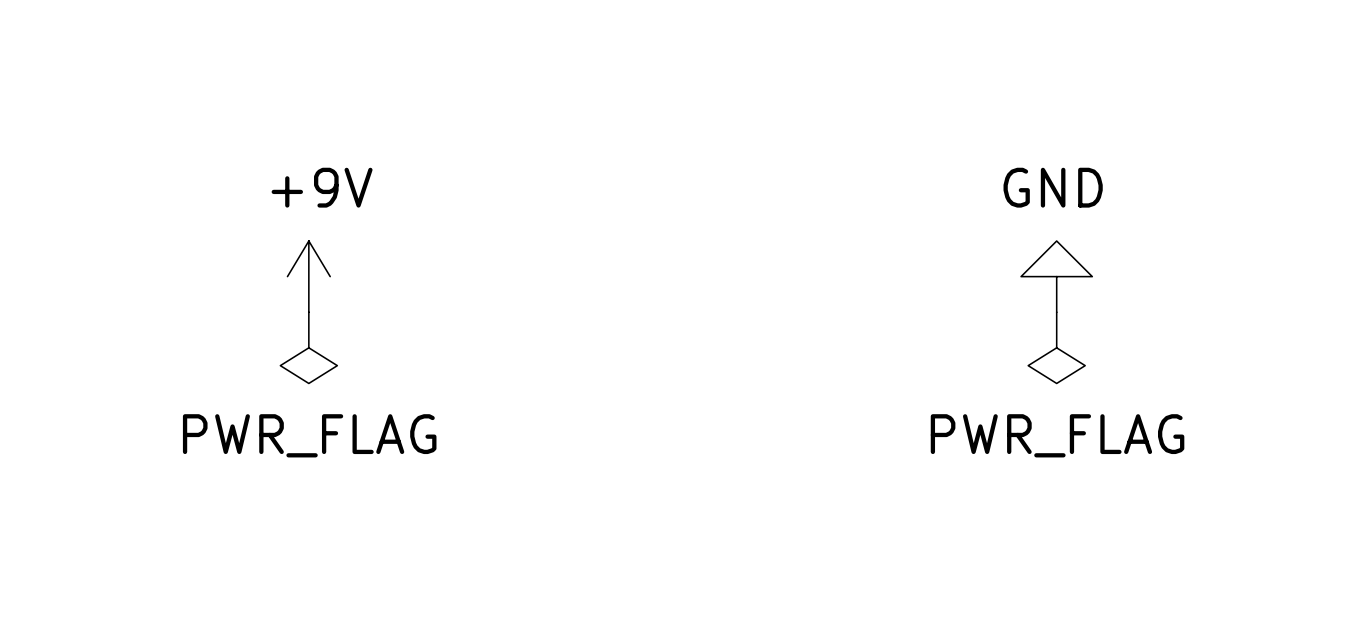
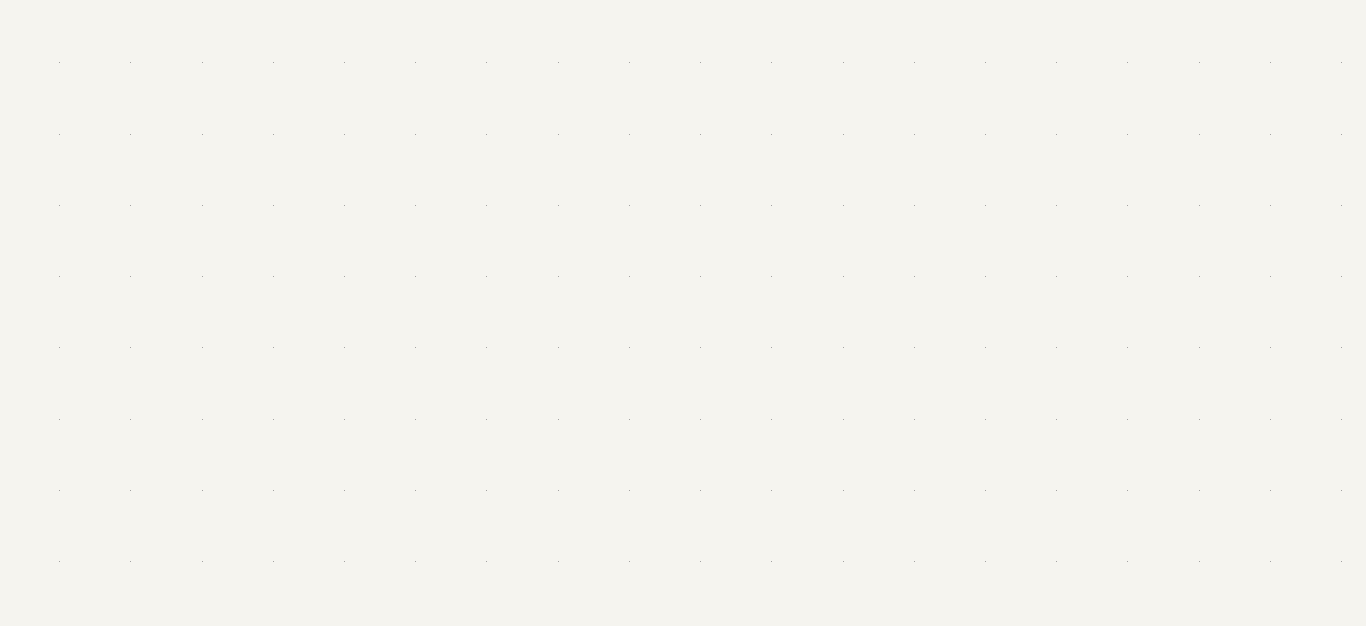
power symbol: +9V (308, 276) -> none
power symbol: GND (1056, 276) -> none
power symbol: PWR_FLAG (308, 347) -> none
power symbol: PWR_FLAG (1056, 347) -> none

